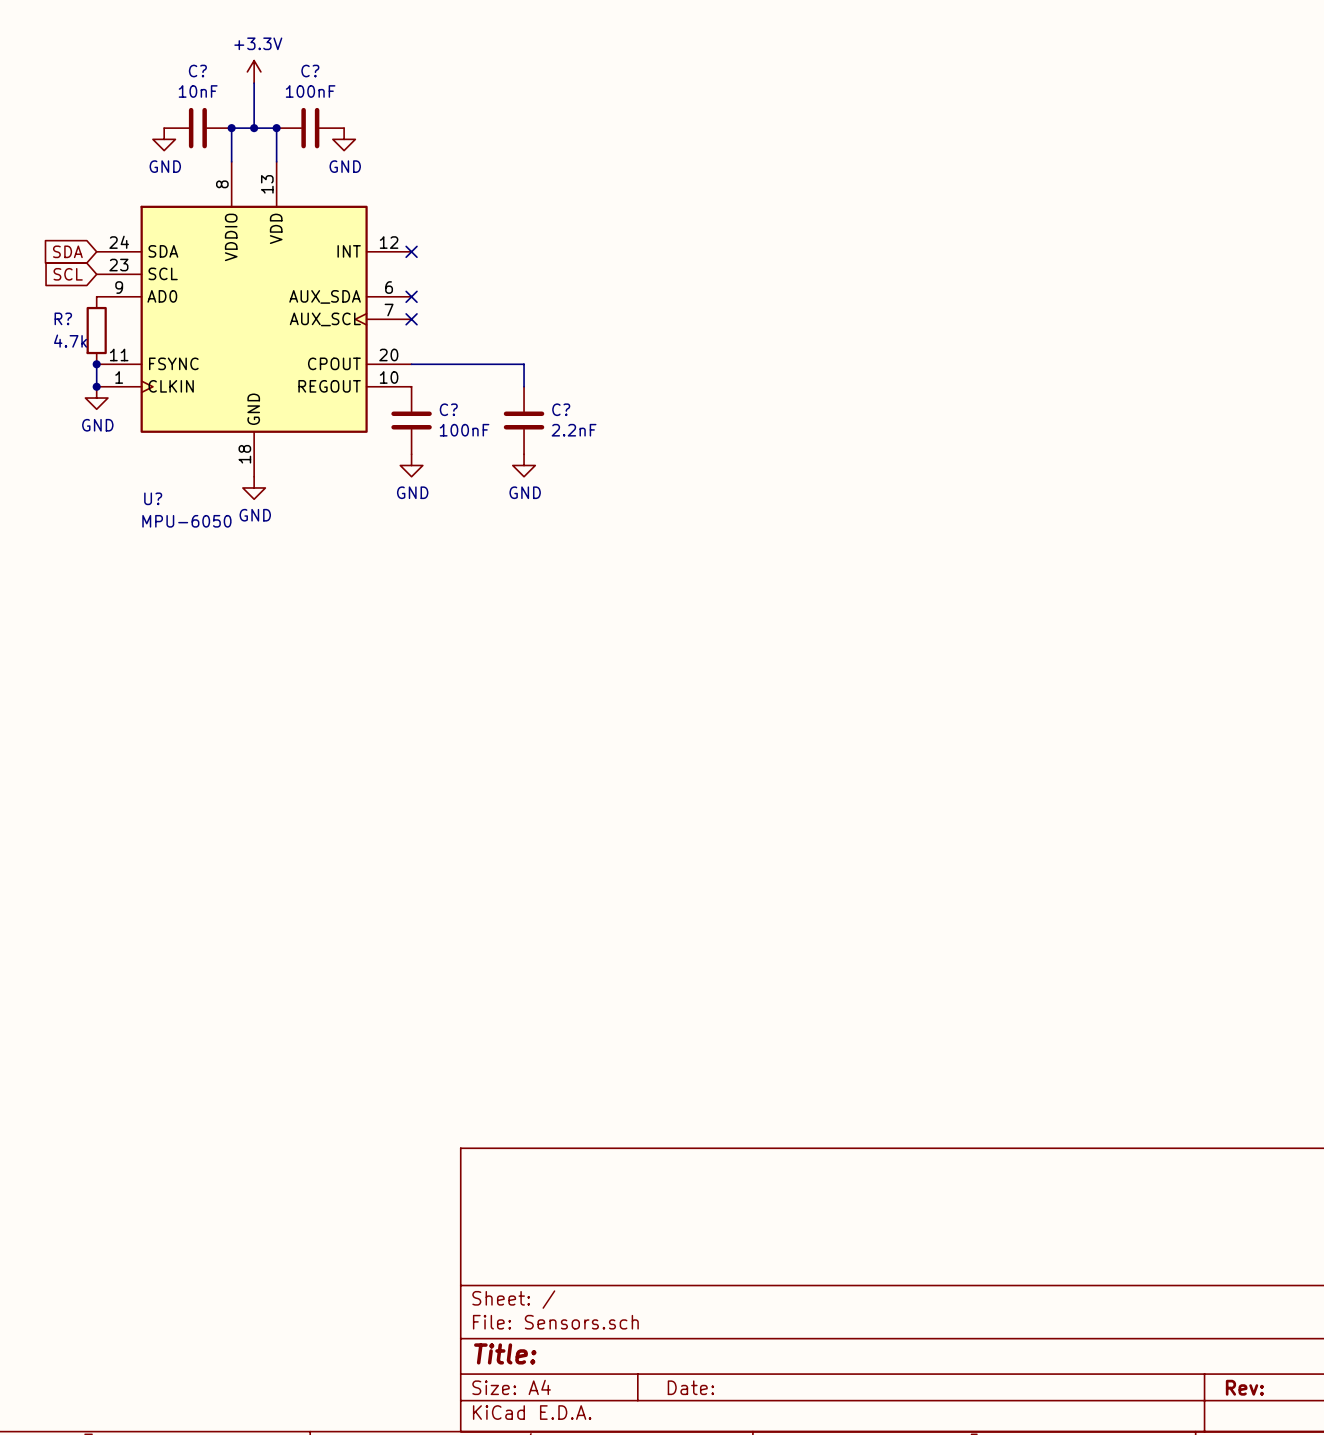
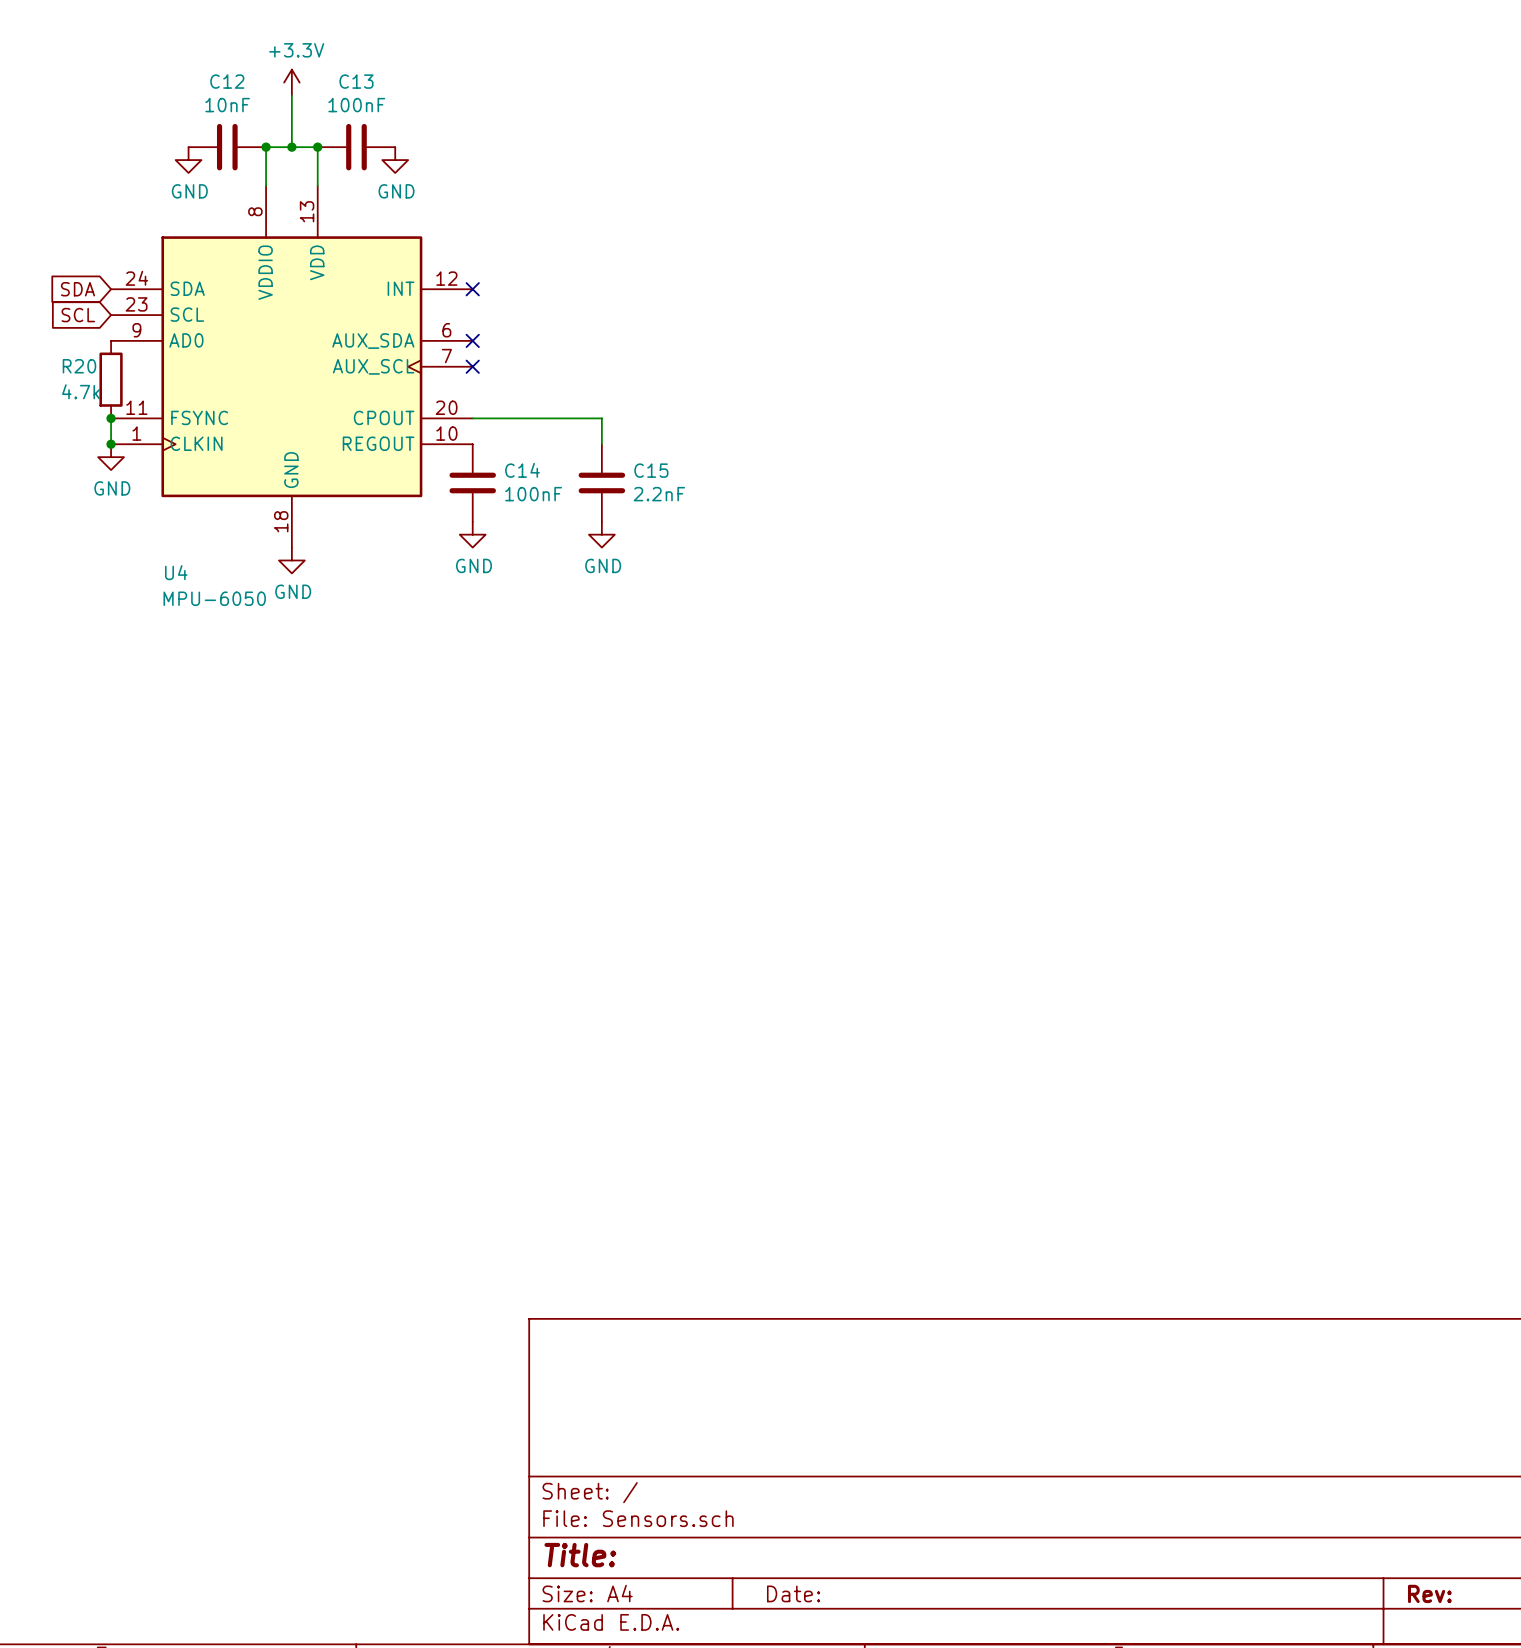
C? name: C? (197, 71) -> C12 (227, 81)
C? name: C? (310, 71) -> C13 (356, 81)
R? name: R? (63, 318) -> R20 (79, 366)
C? name: C? (448, 409) -> C14 (522, 470)
C? name: C? (561, 409) -> C15 (651, 470)
U? name: U? (153, 498) -> U4 (176, 572)

